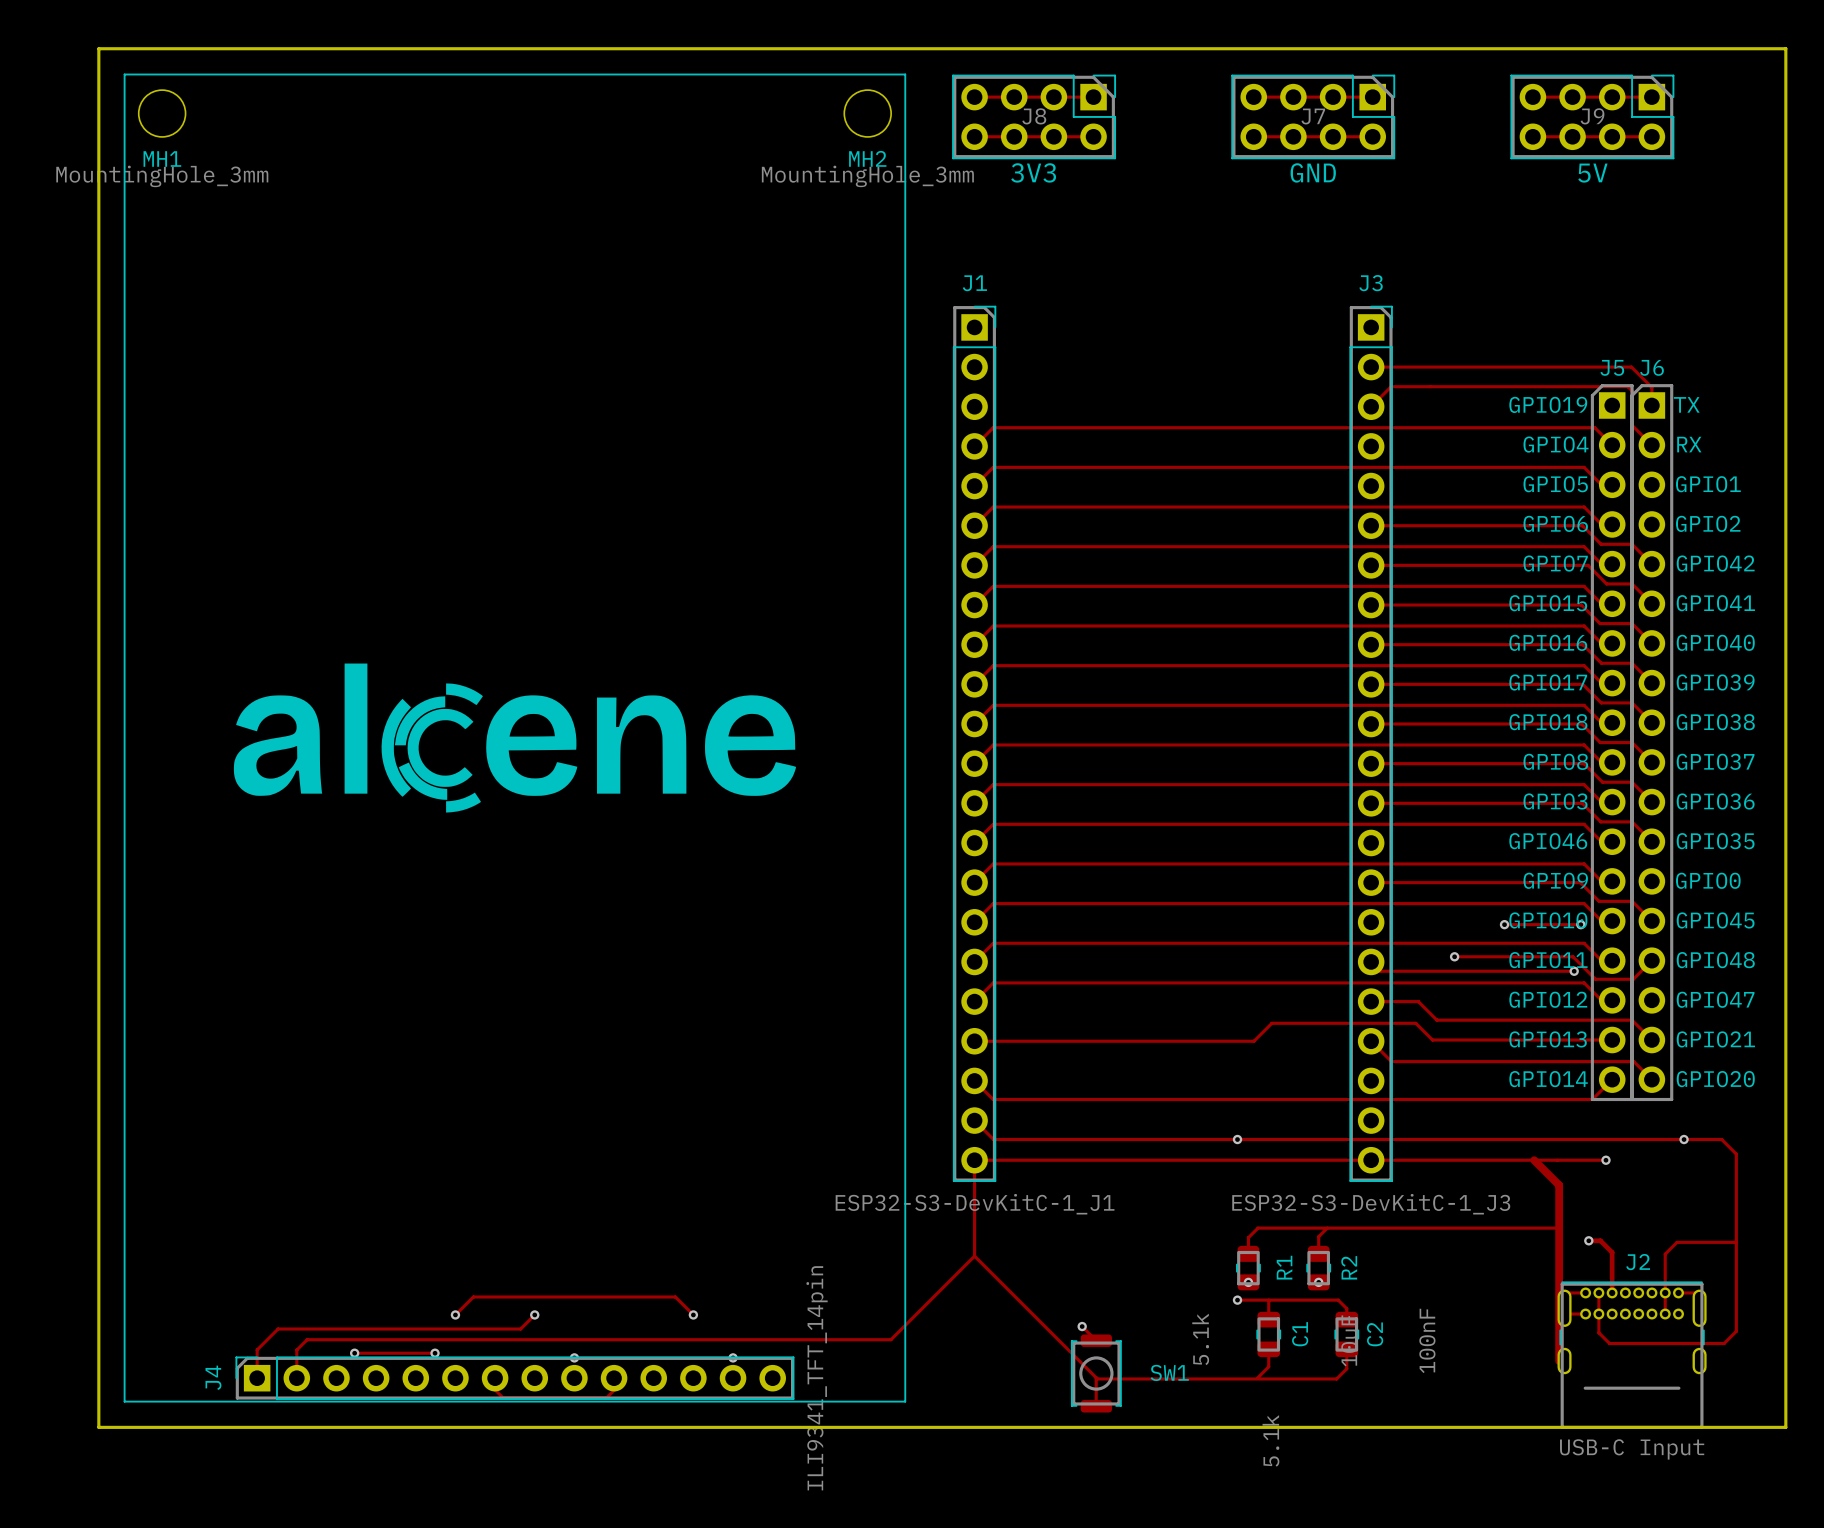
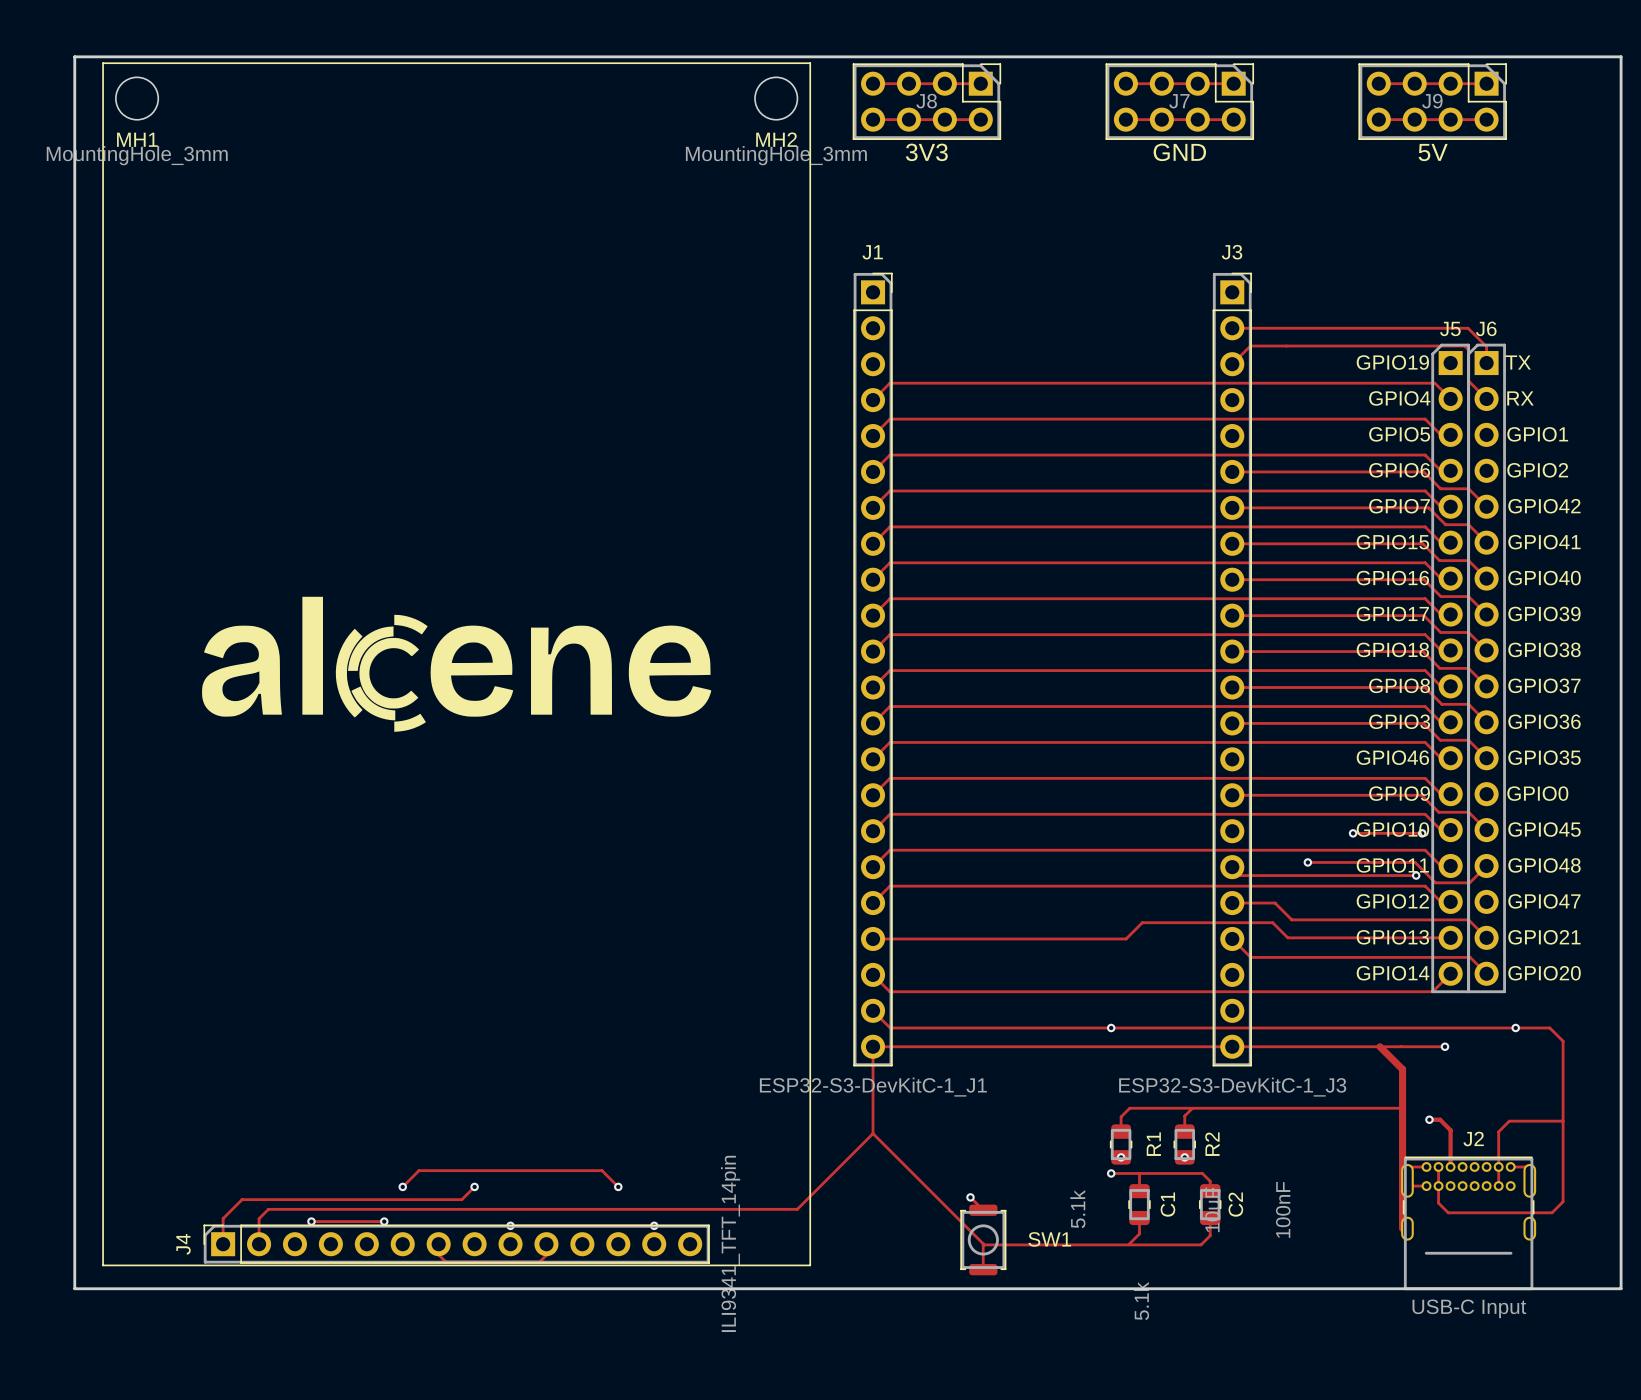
board edge: (98, 1427) (98, 48) (1785, 48) (1785, 1427) -> (79, 1288) (74, 1288) (74, 56) (1621, 56) (1621, 1288) (1607, 1288)

